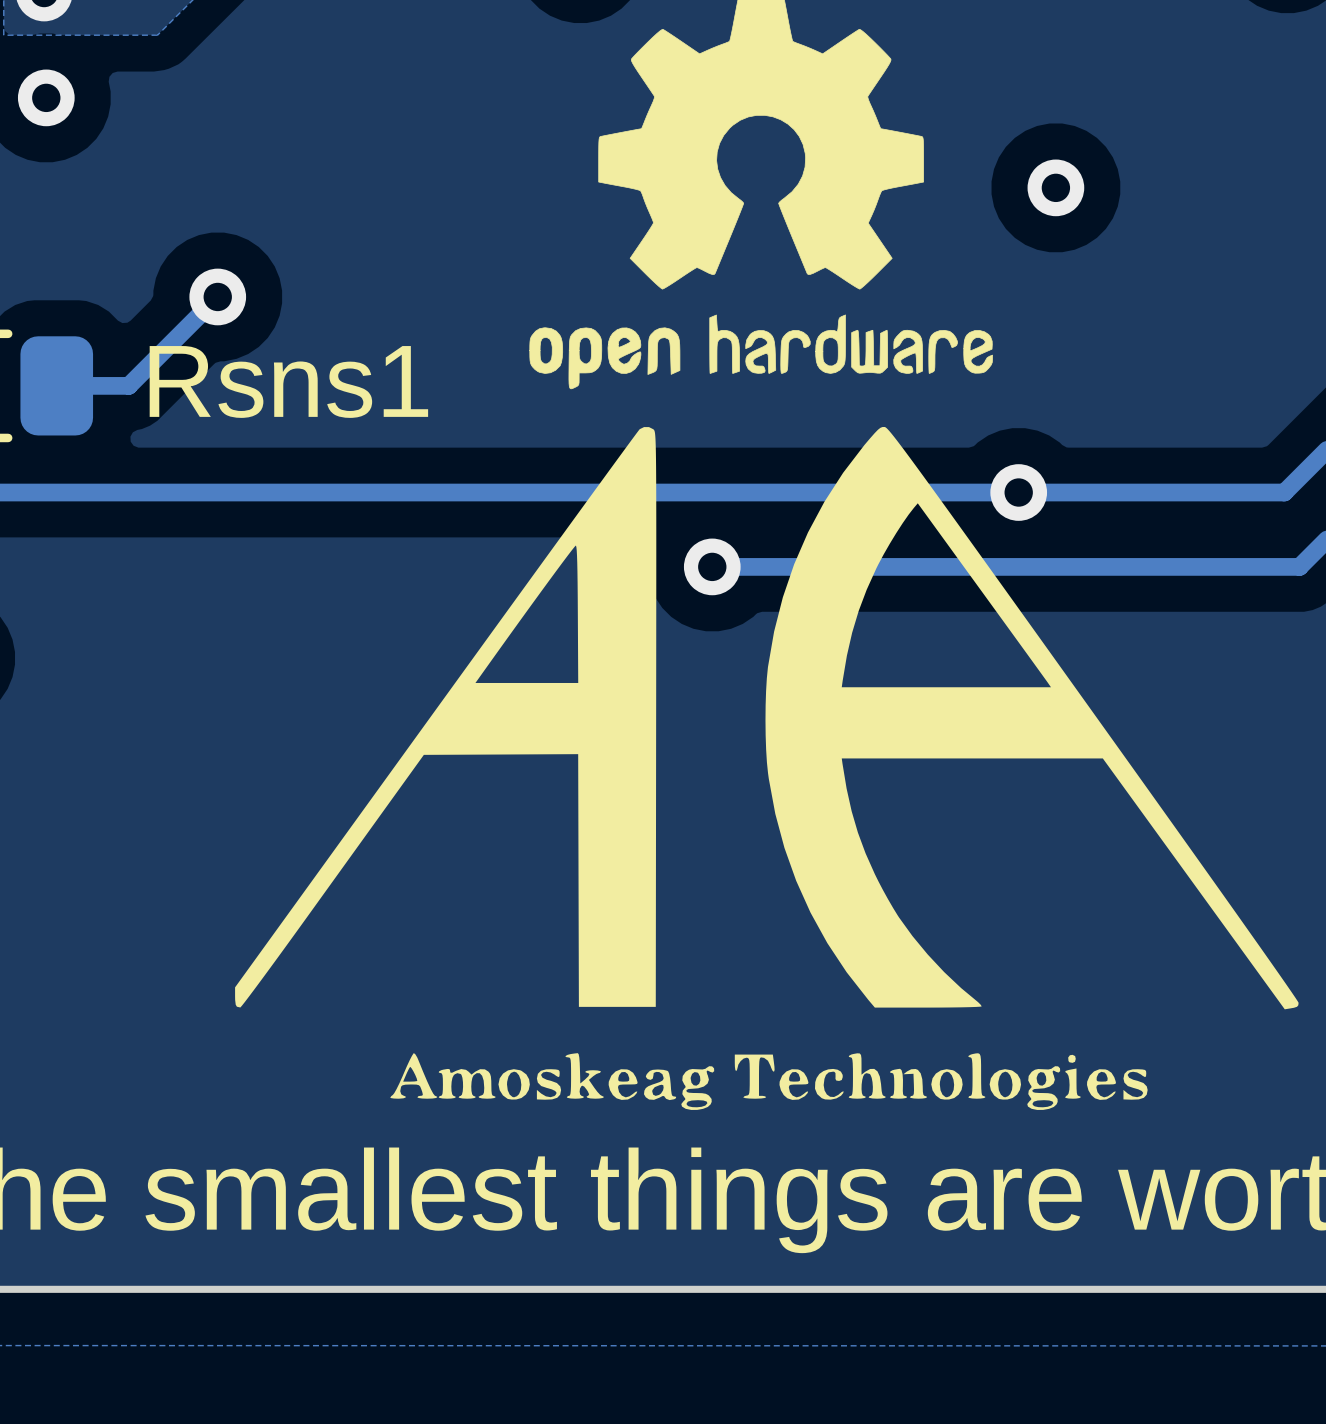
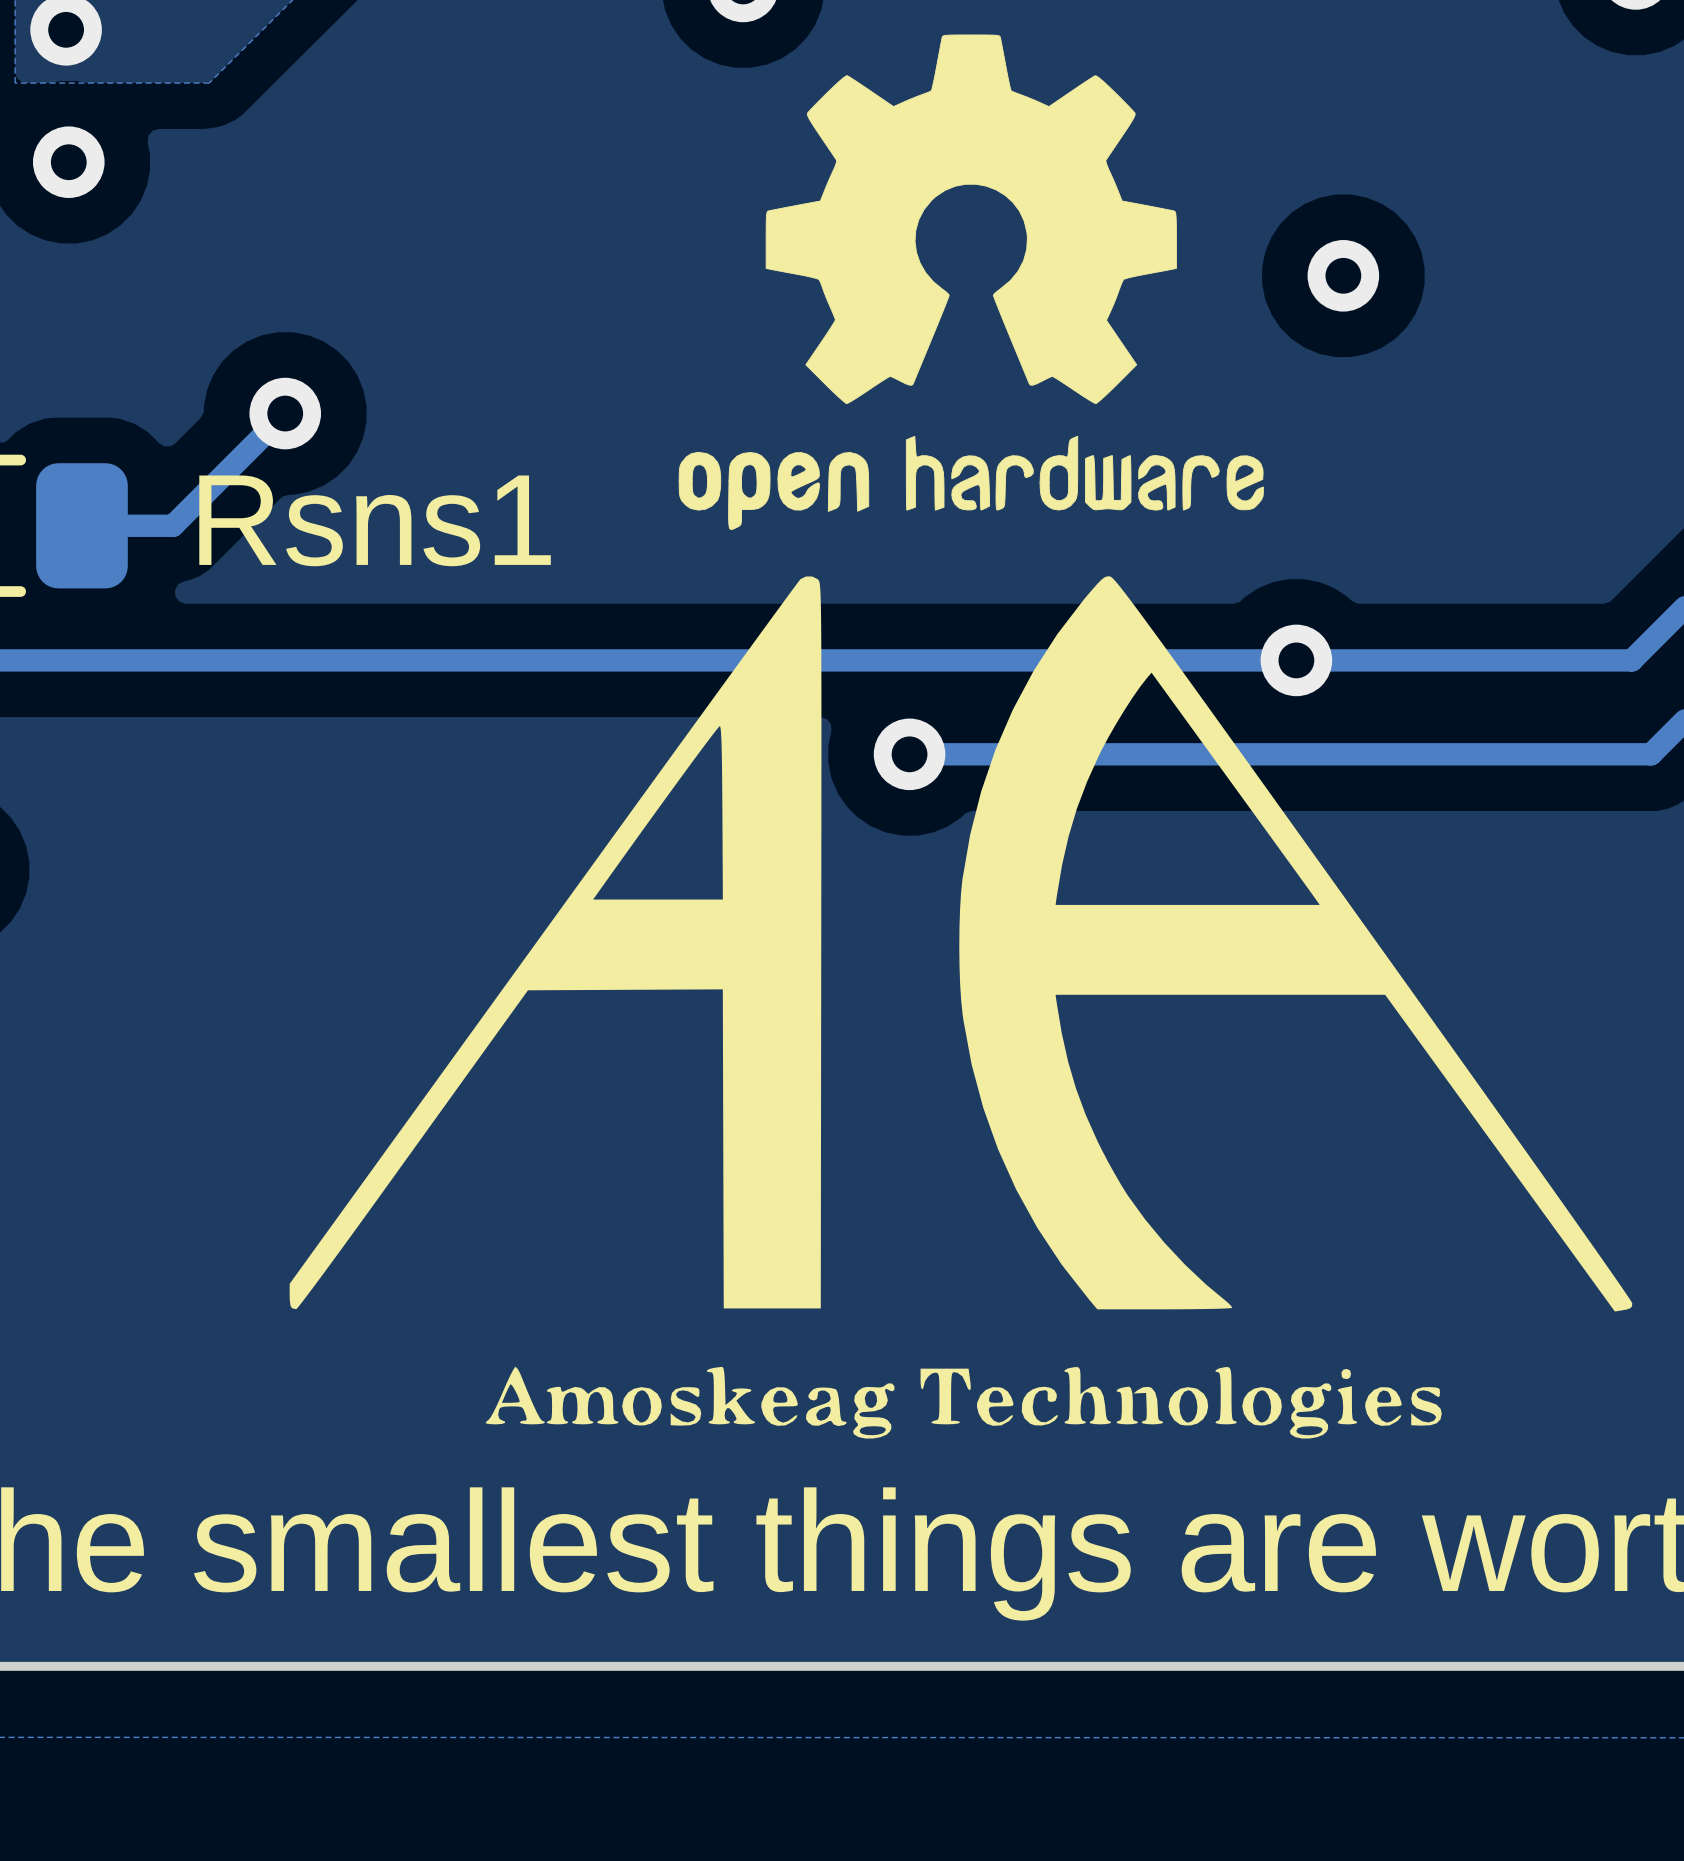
drawing position: (766, 768) -> (960, 1007)

